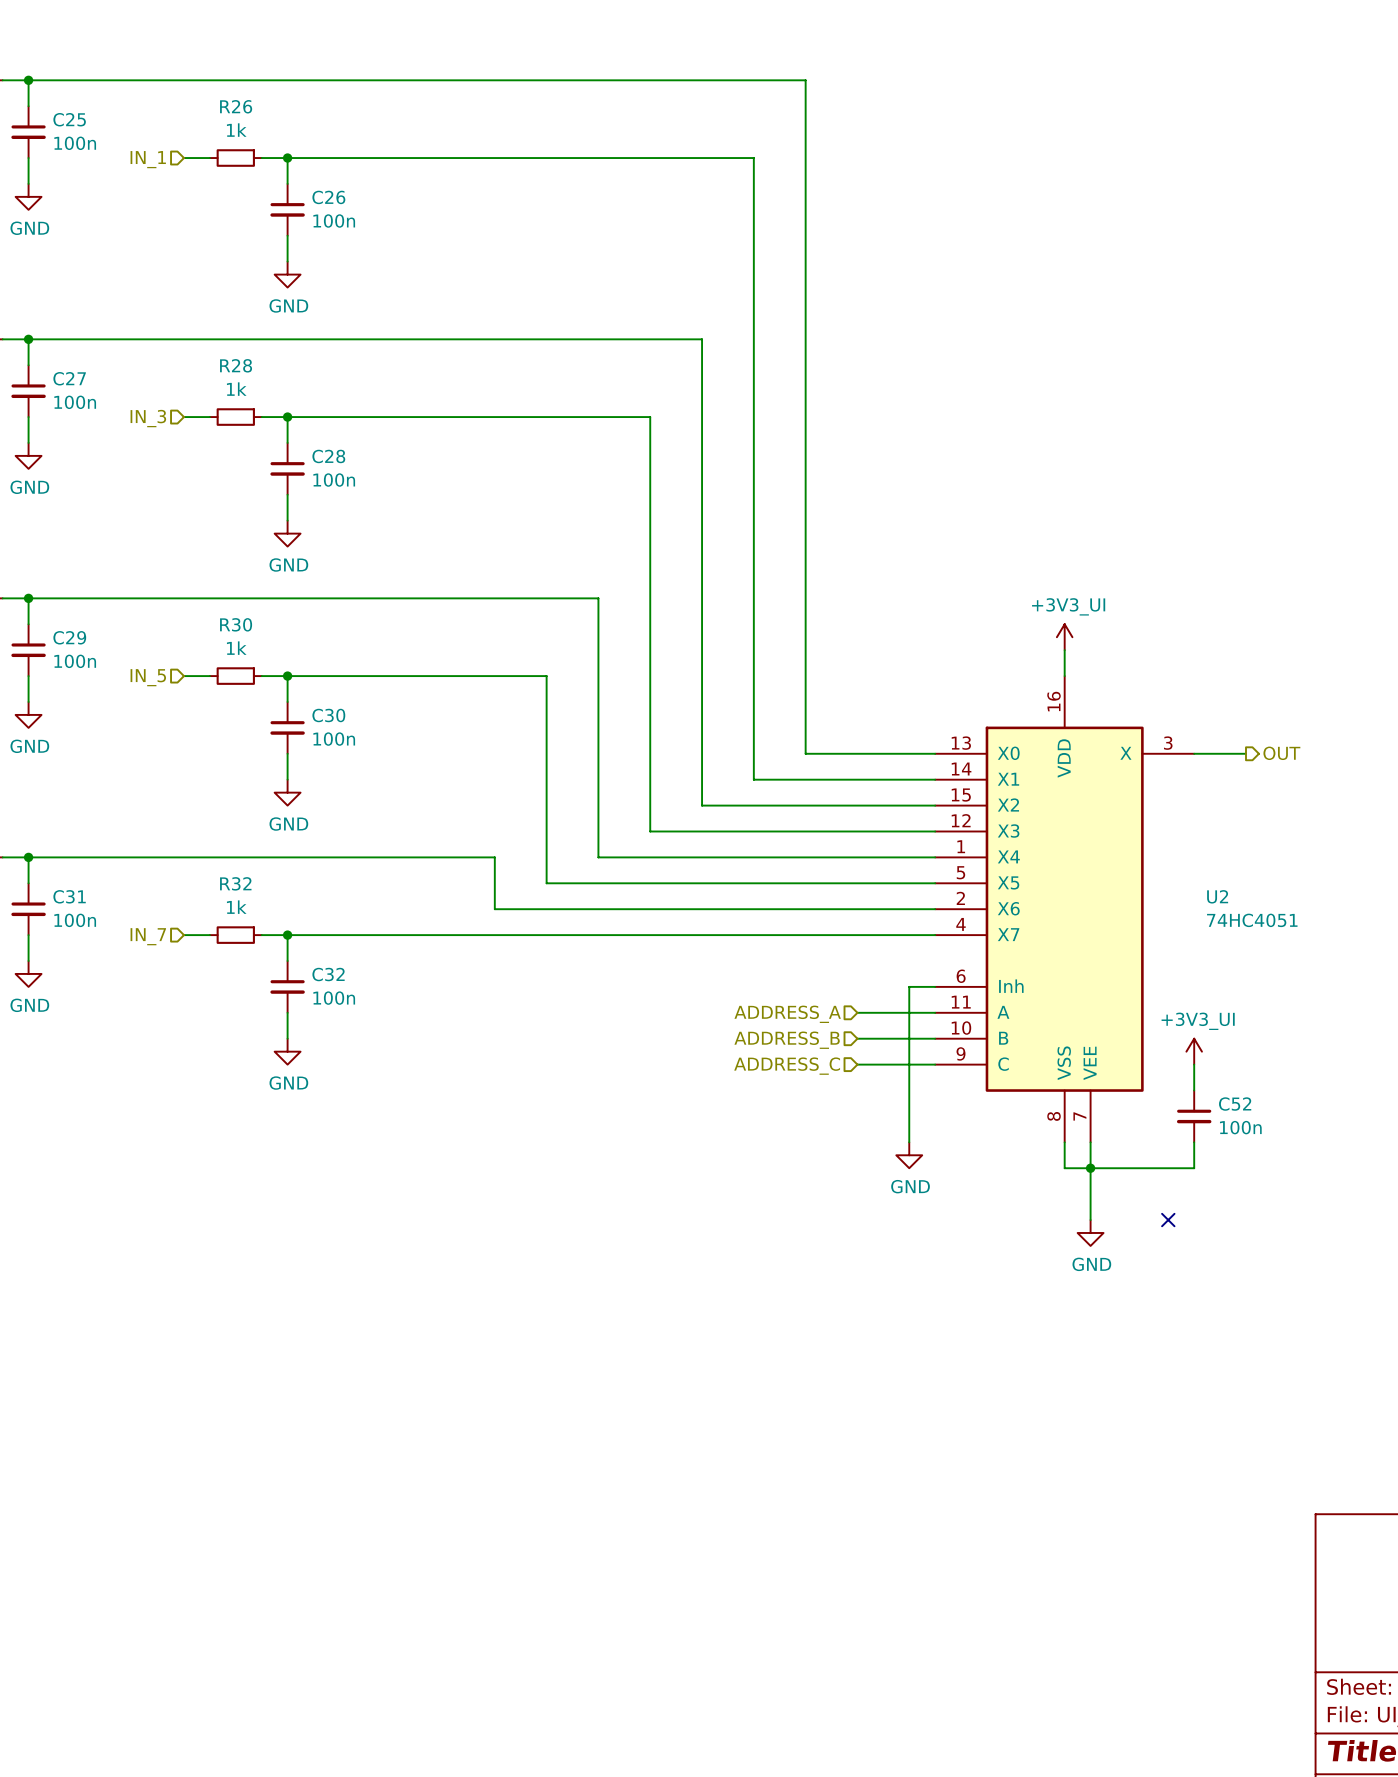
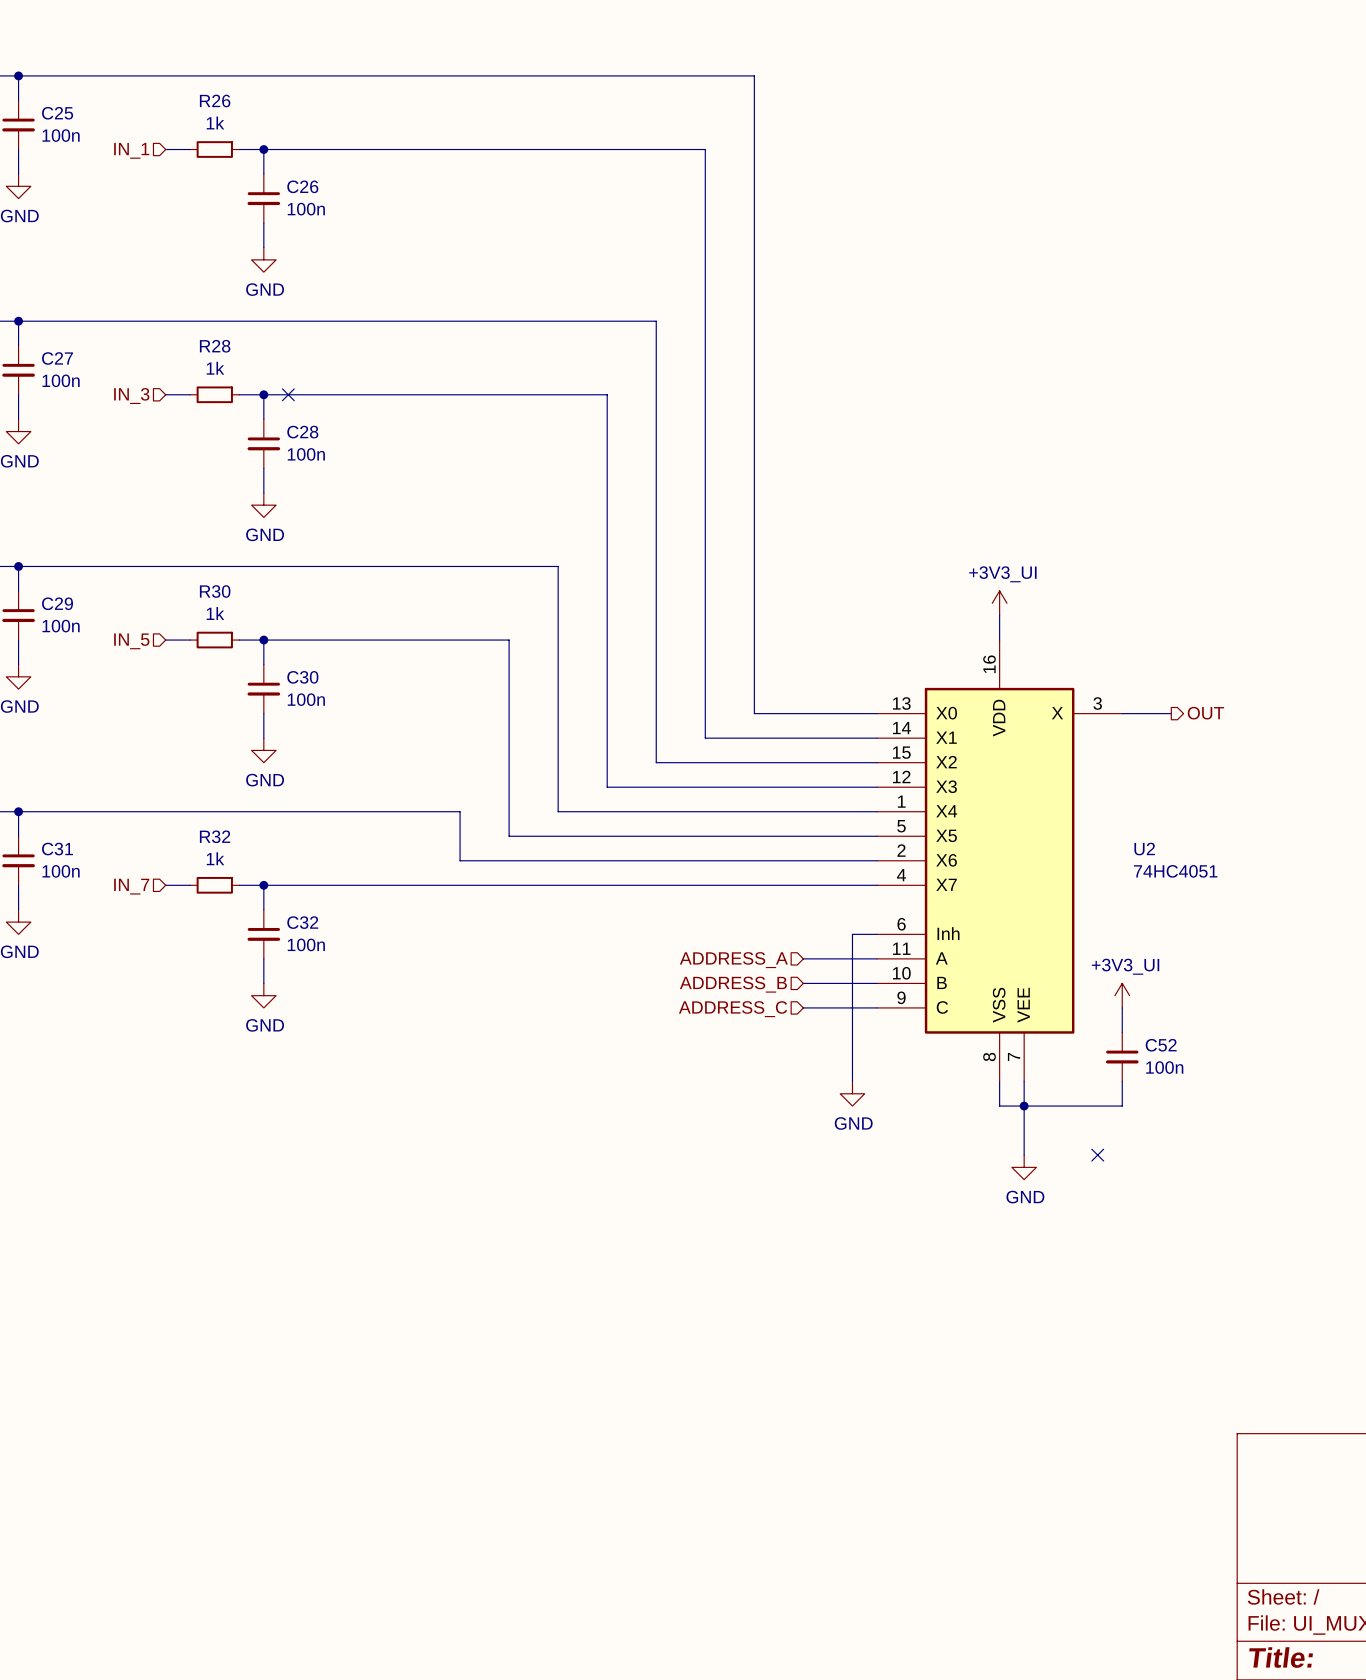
no-connect mark: none -> (288, 394)

